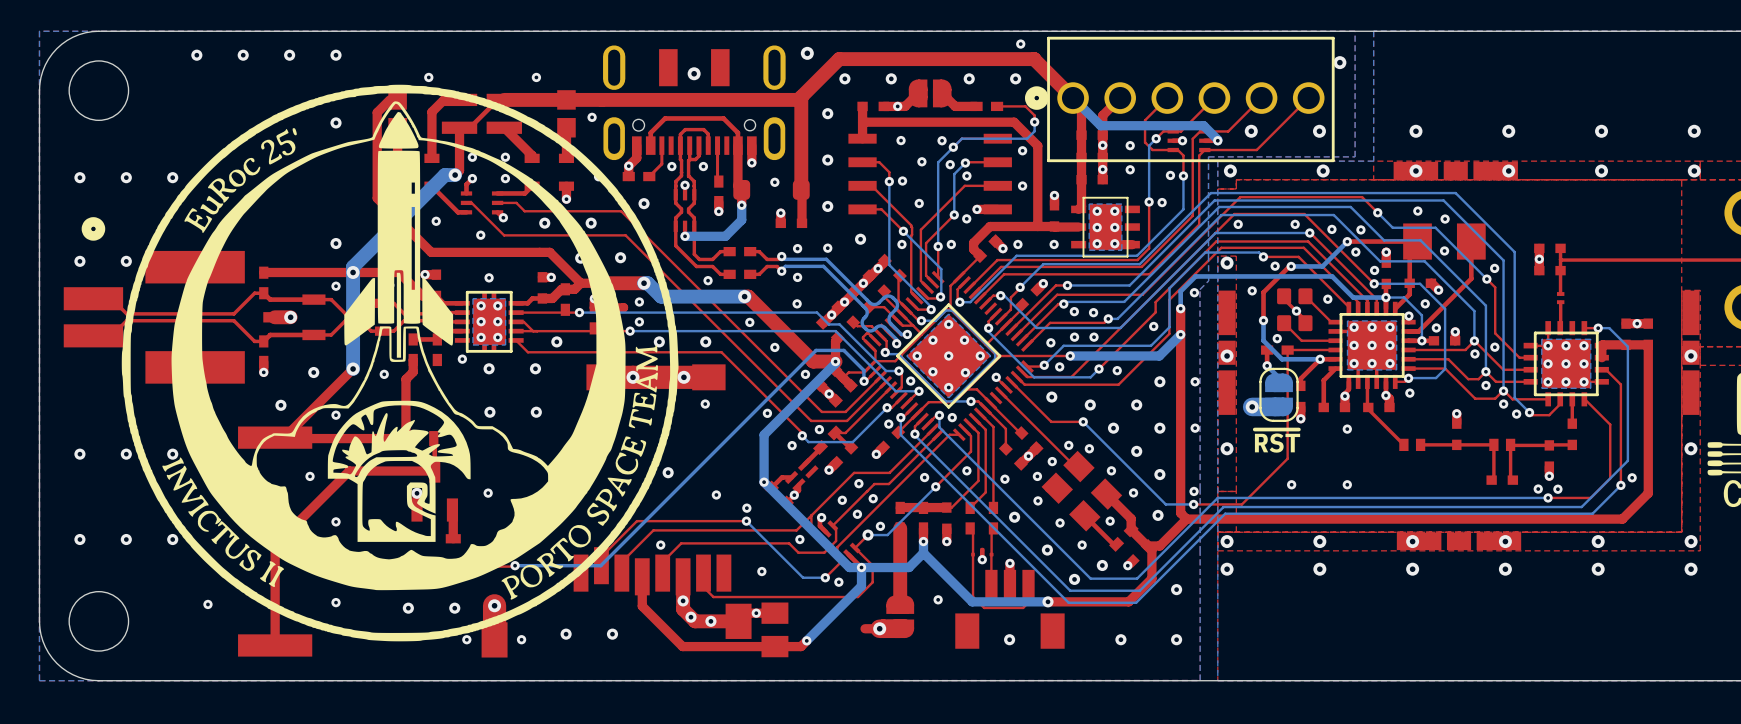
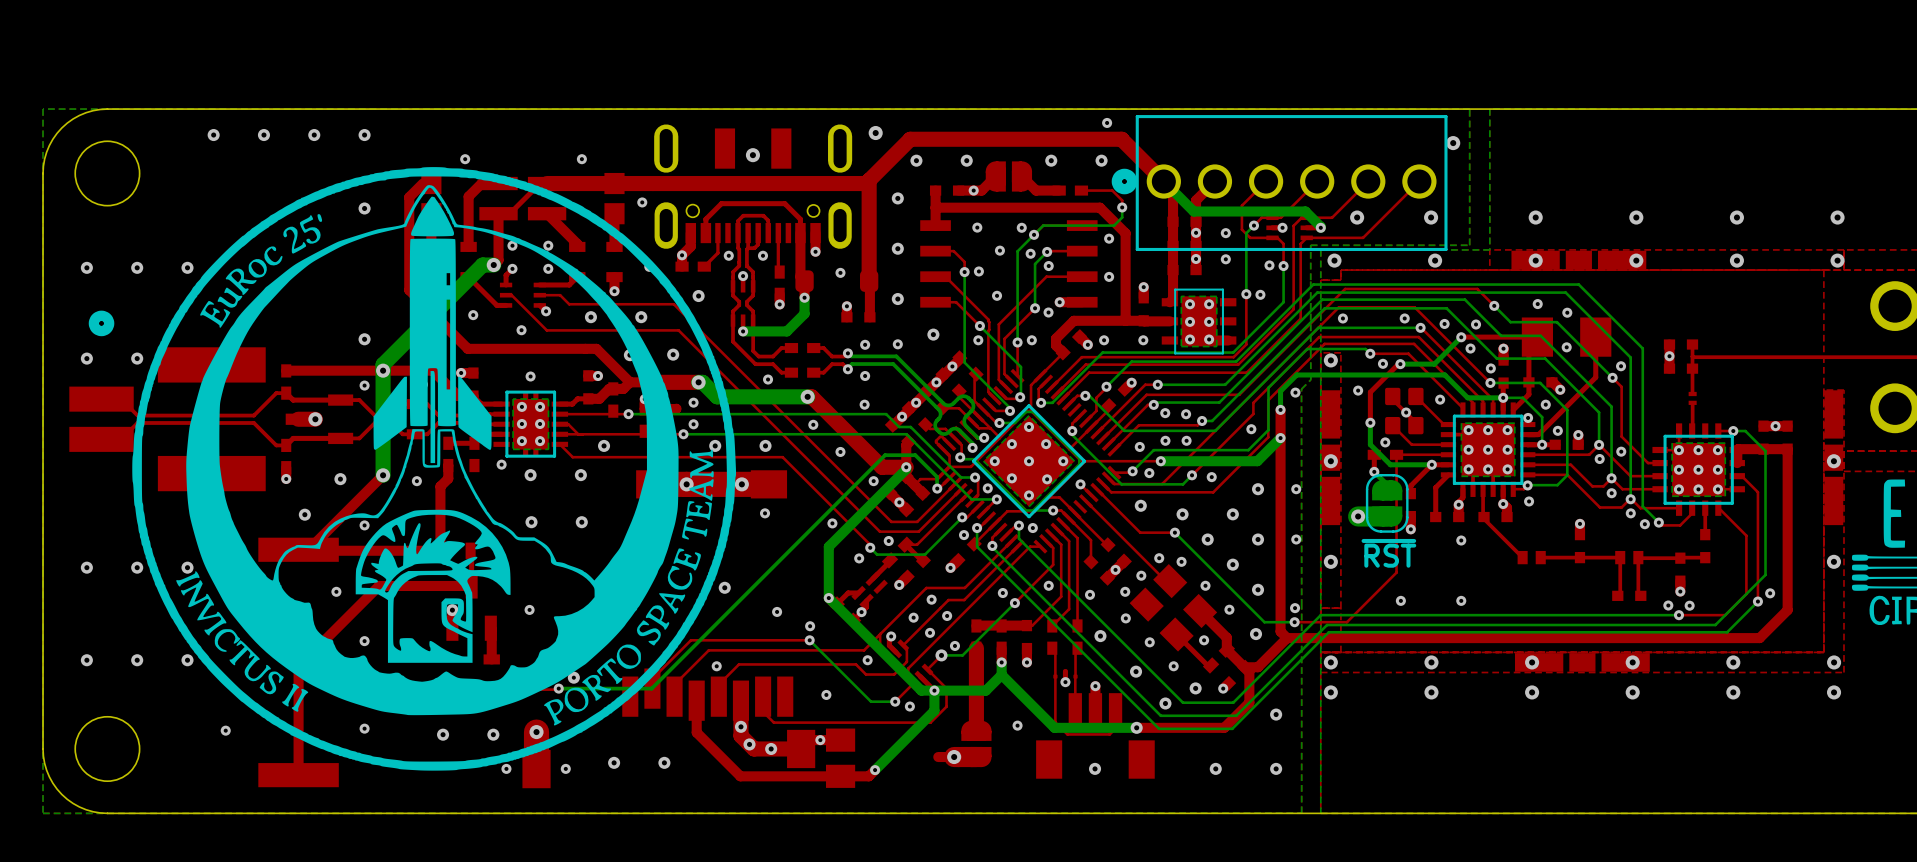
via: none -> (573, 677)

